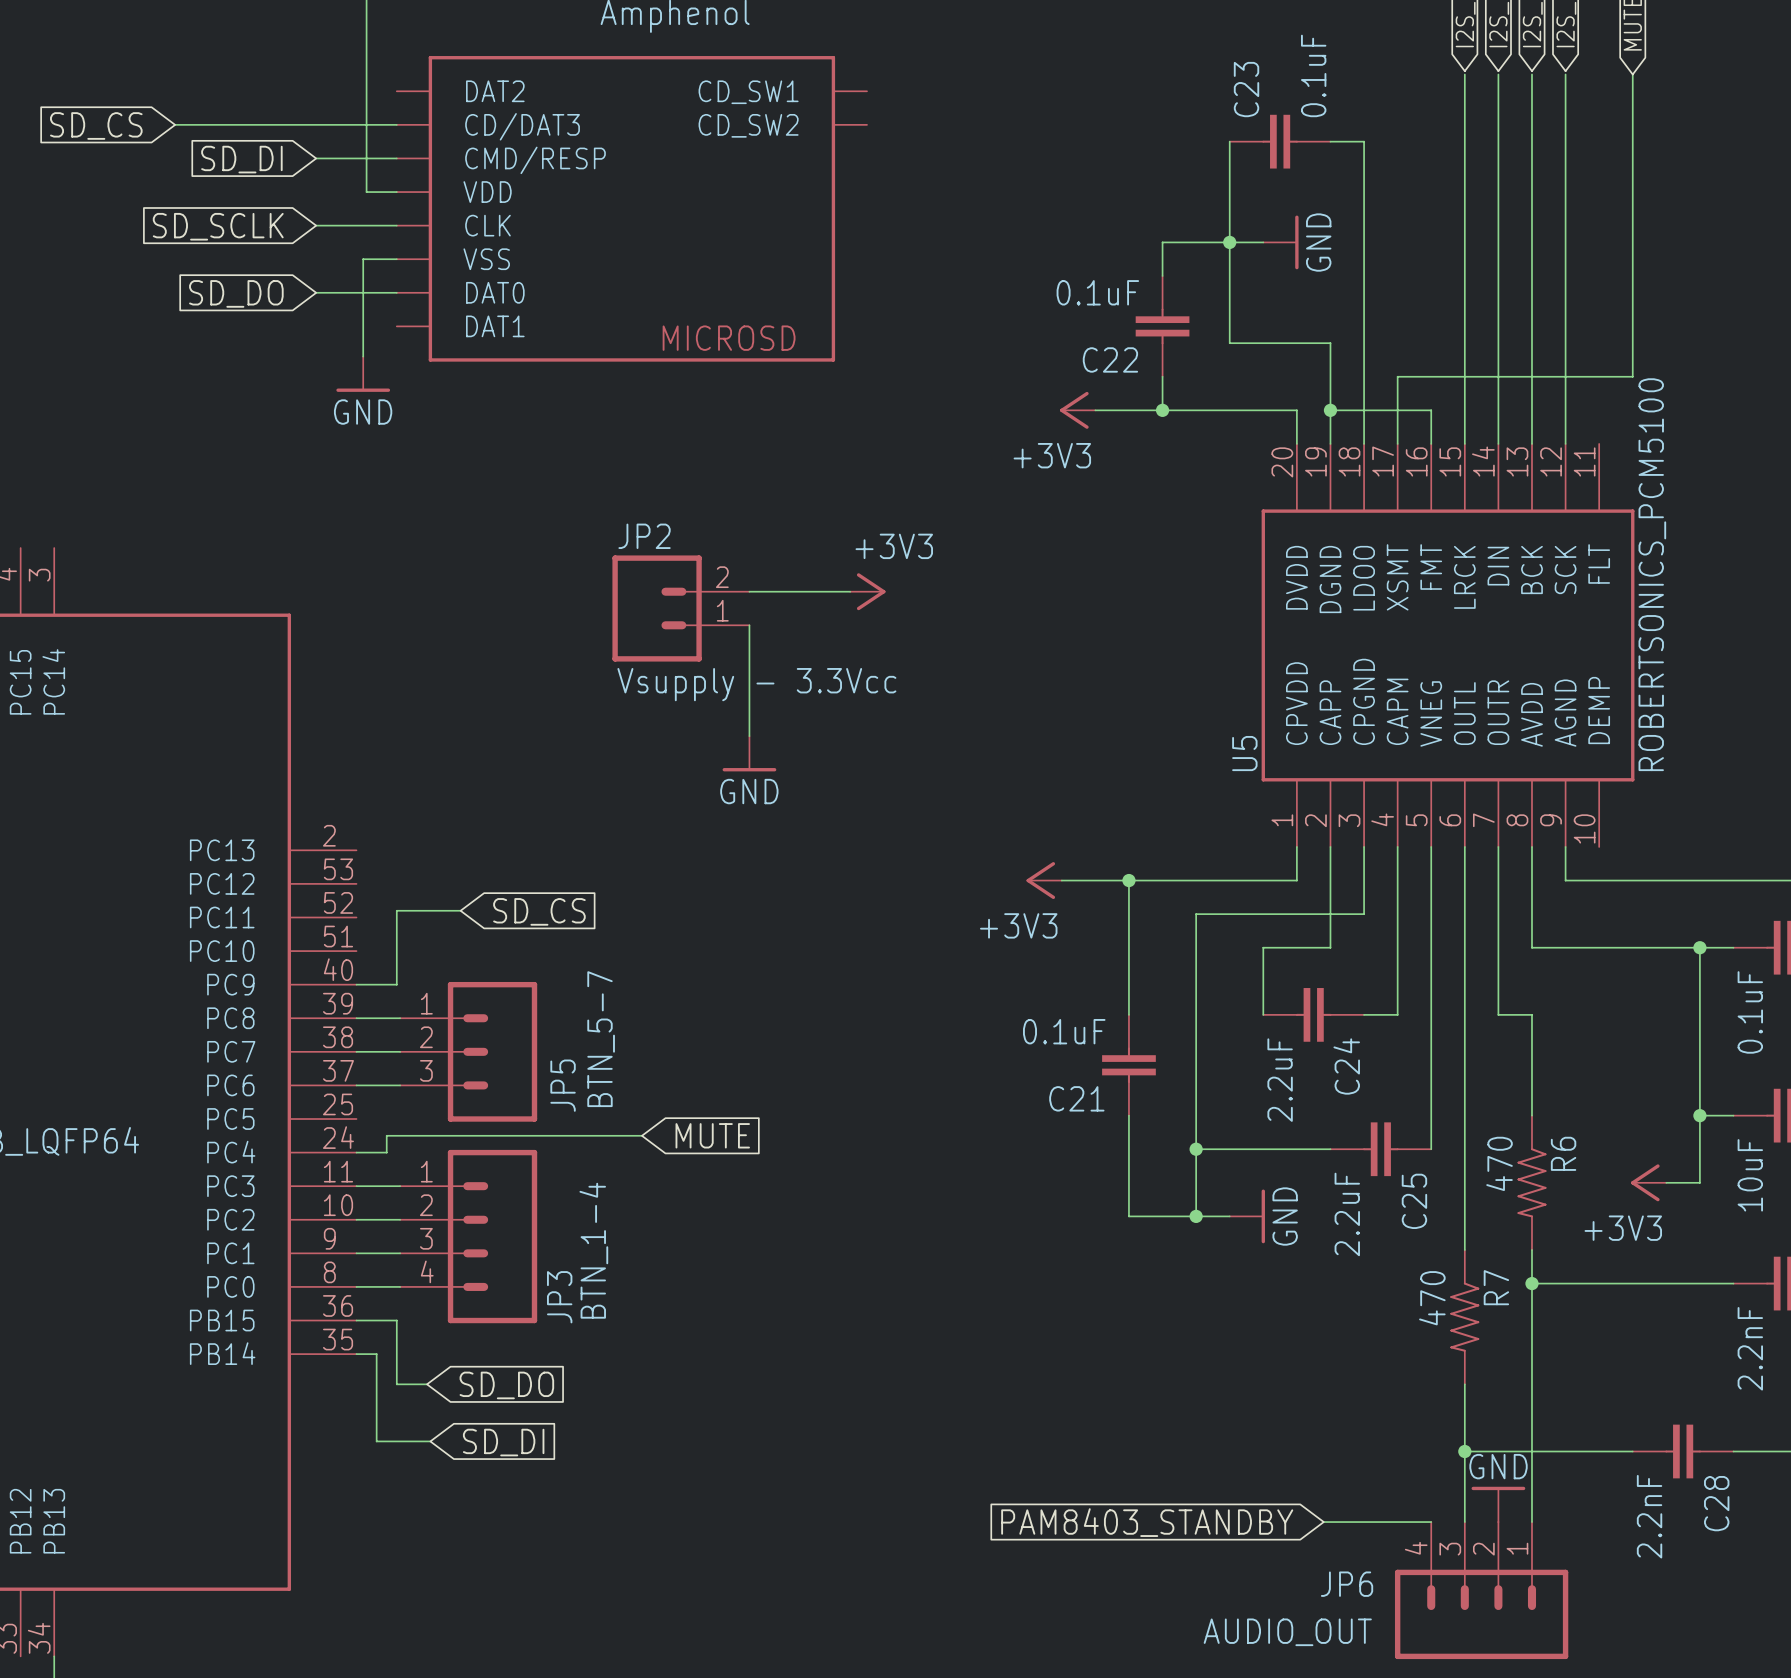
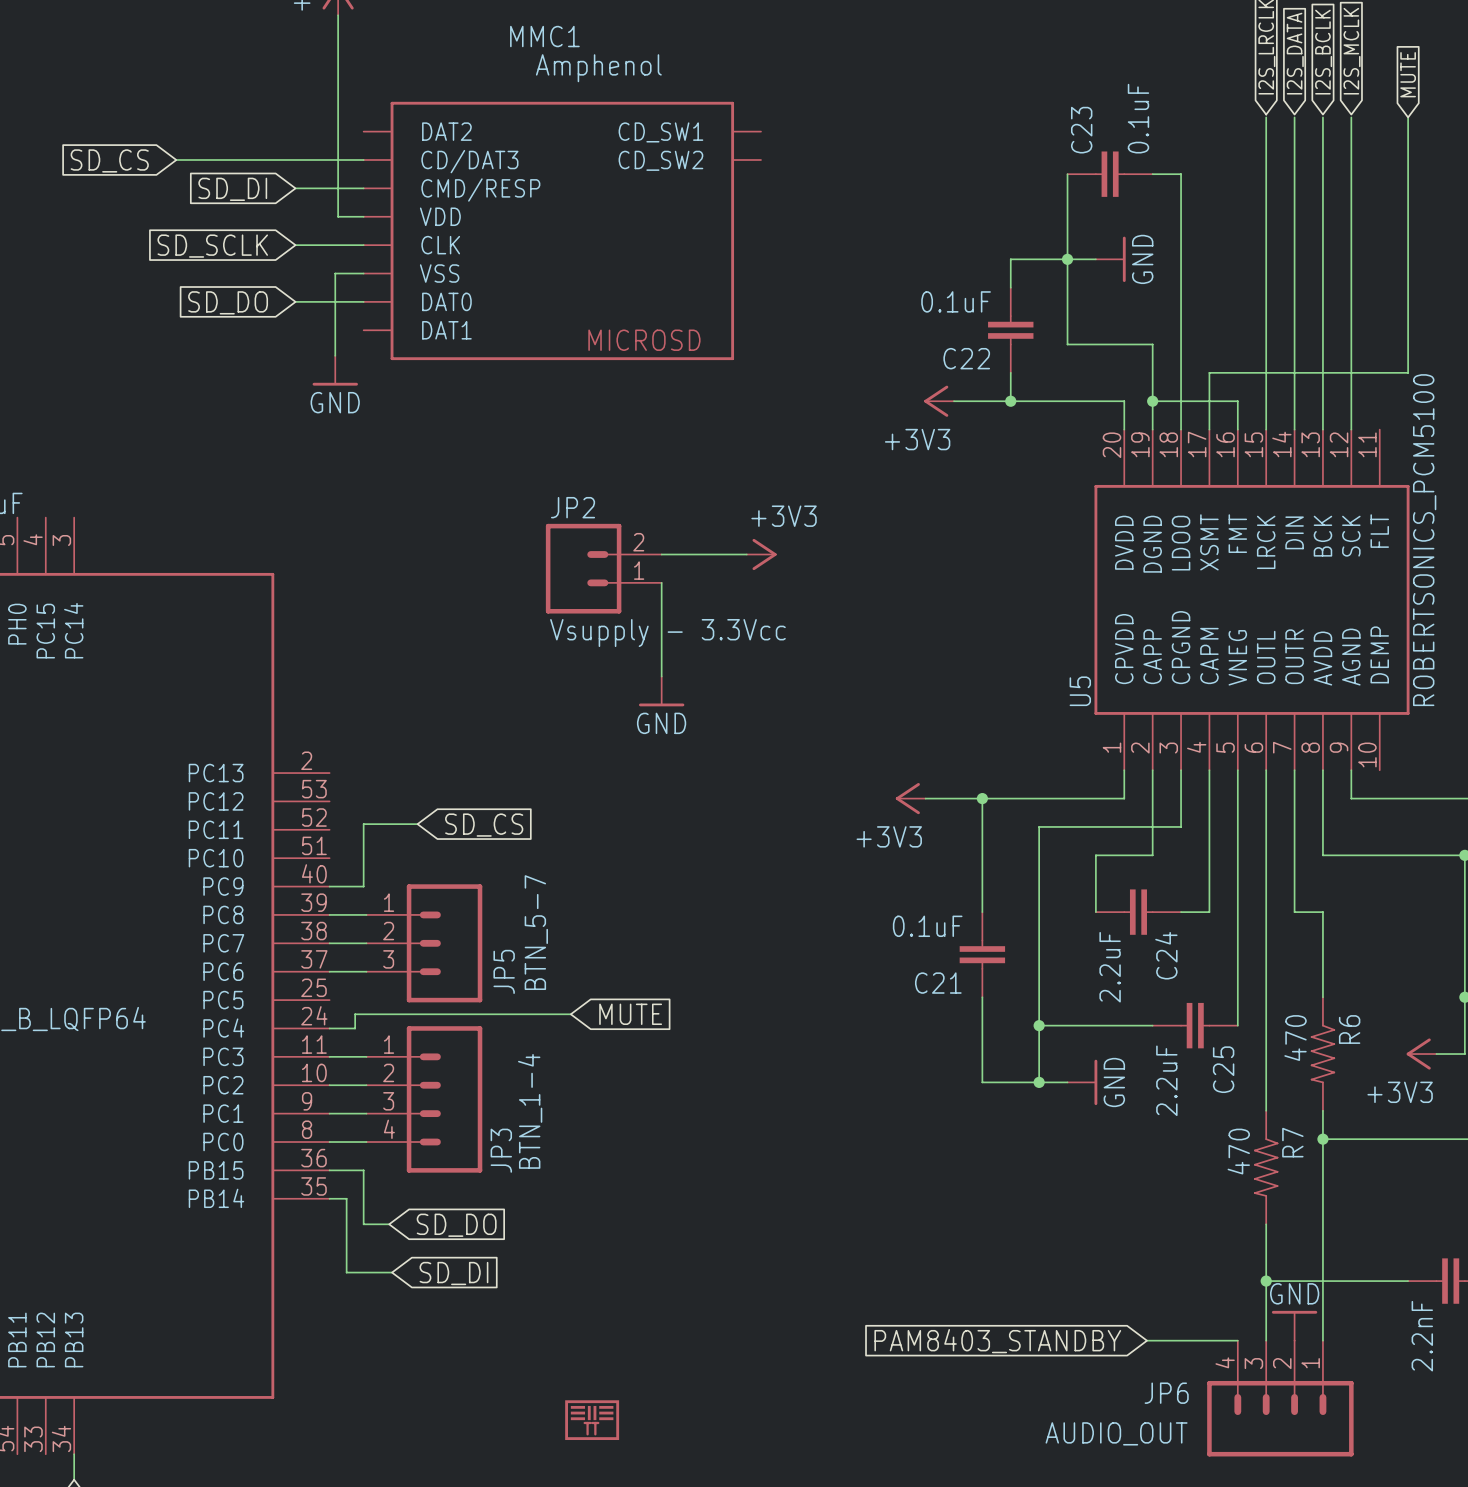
drawing: none -> [565, 1400, 620, 1441]
text: none -> TT (591, 1428)

